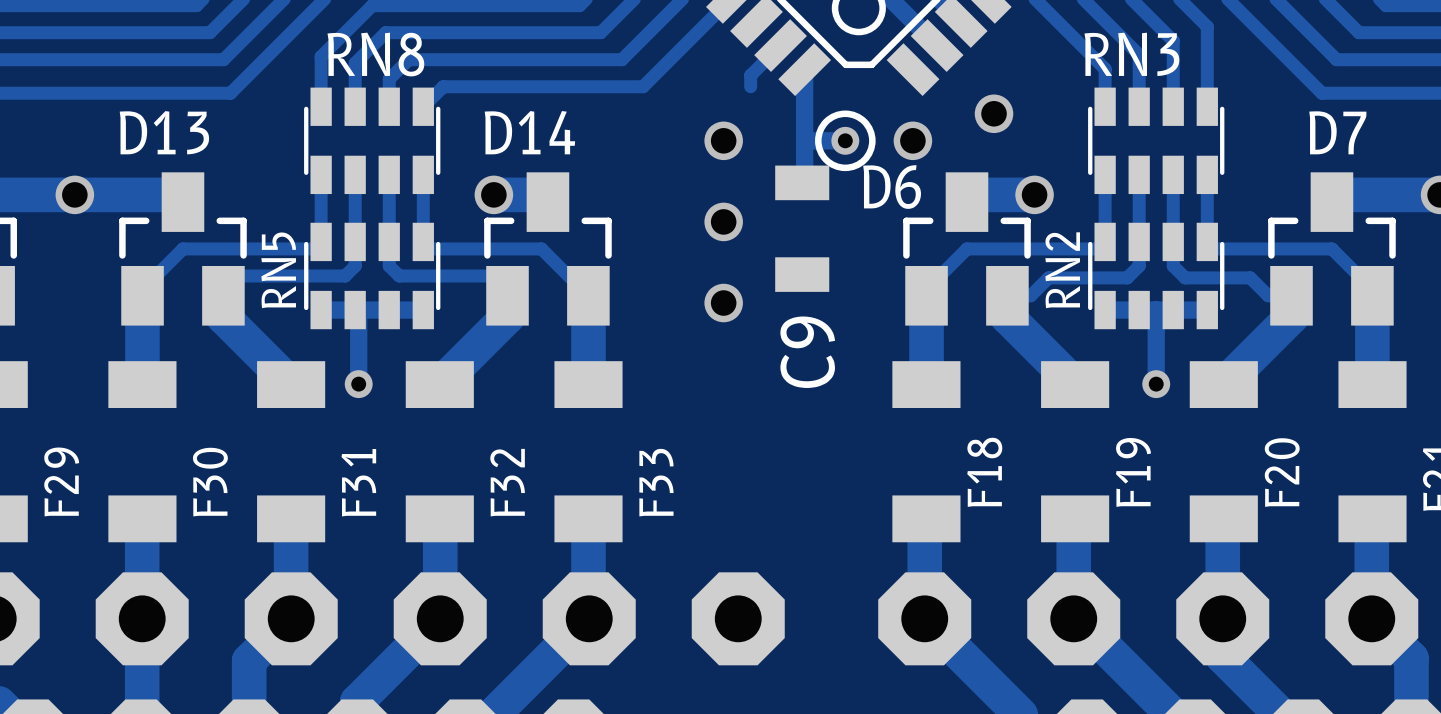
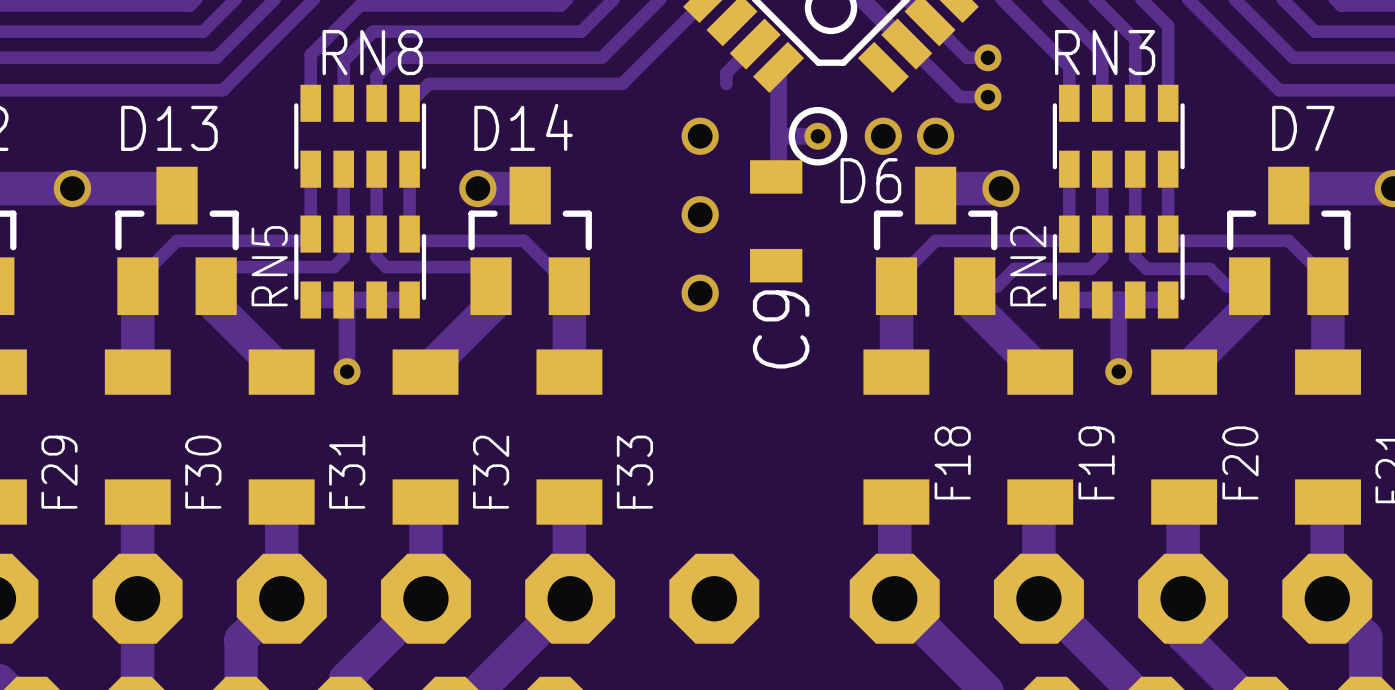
track: none -> (930, 20) (967, 57) (987, 57)
track: none -> (906, 44) (959, 97) (987, 97)
via: none -> (987, 57)
via: none -> (987, 97)
via position: (994, 113) -> (935, 136)

